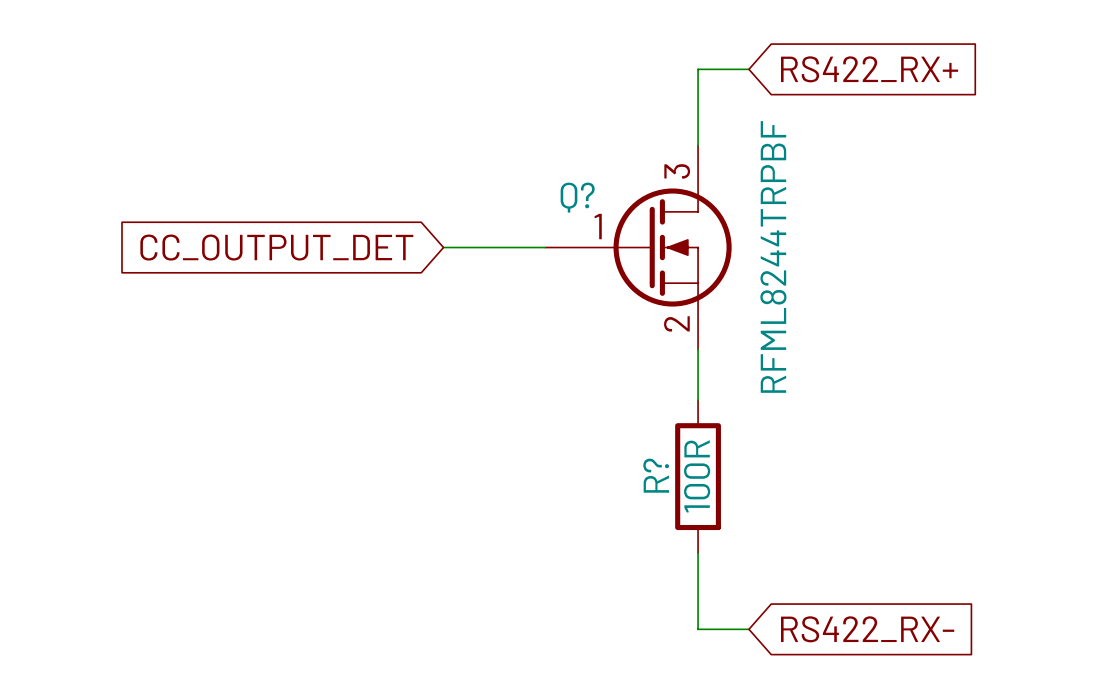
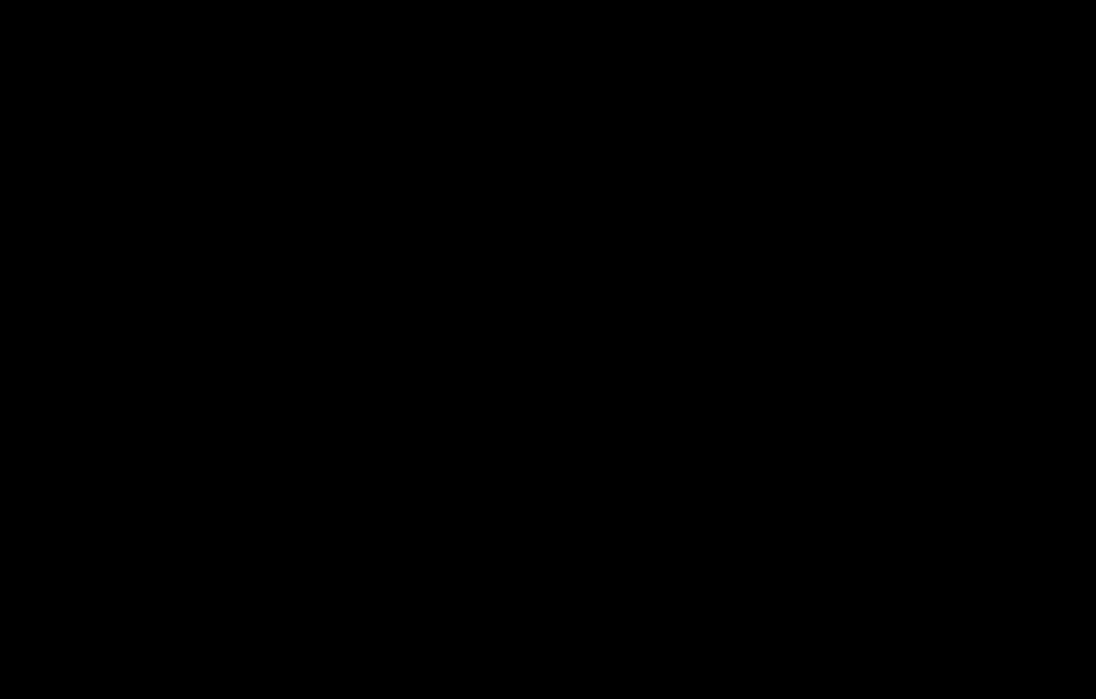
wire: (748, 69) (698, 69) (698, 145) -> none
global label: RS422_RX+ (869, 69) -> none
global label: CC_OUTPUT_DET (276, 247) -> none
wire: (443, 247) (545, 247) -> none
Q?: RFML8244TRPBF (638, 247) -> none
wire: (698, 349) (698, 400) -> none
R?: 100R (698, 476) -> none
wire: (698, 552) (698, 629) (748, 629) -> none
global label: RS422_RX- (867, 629) -> none

